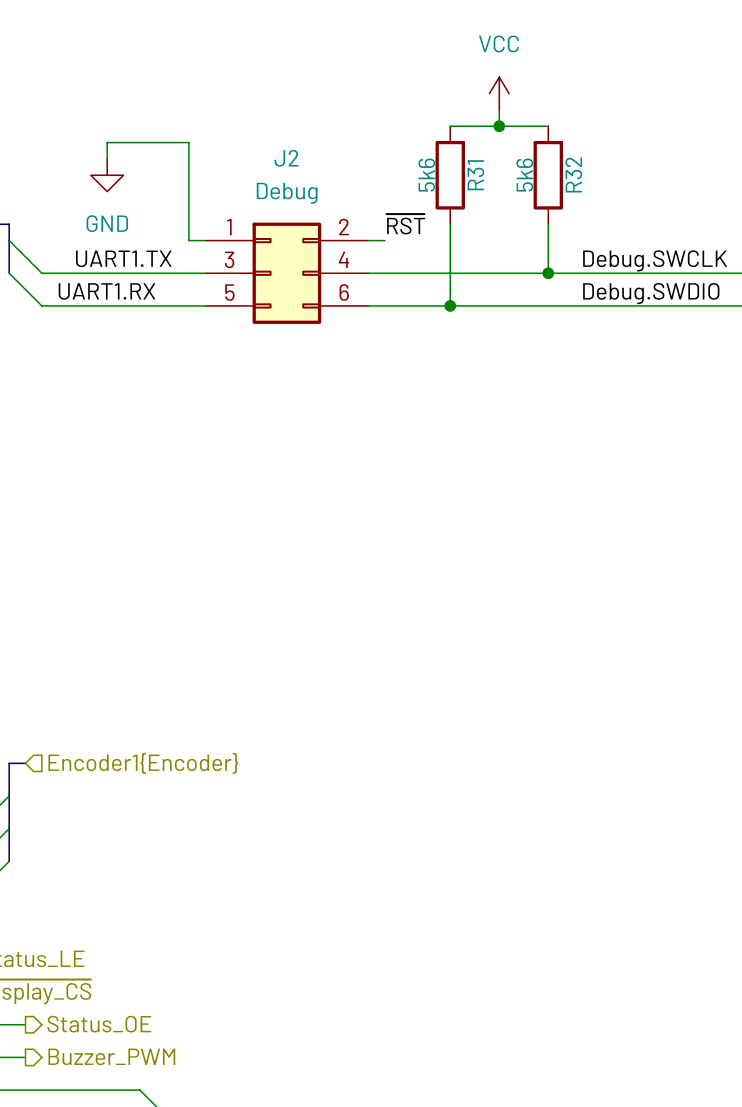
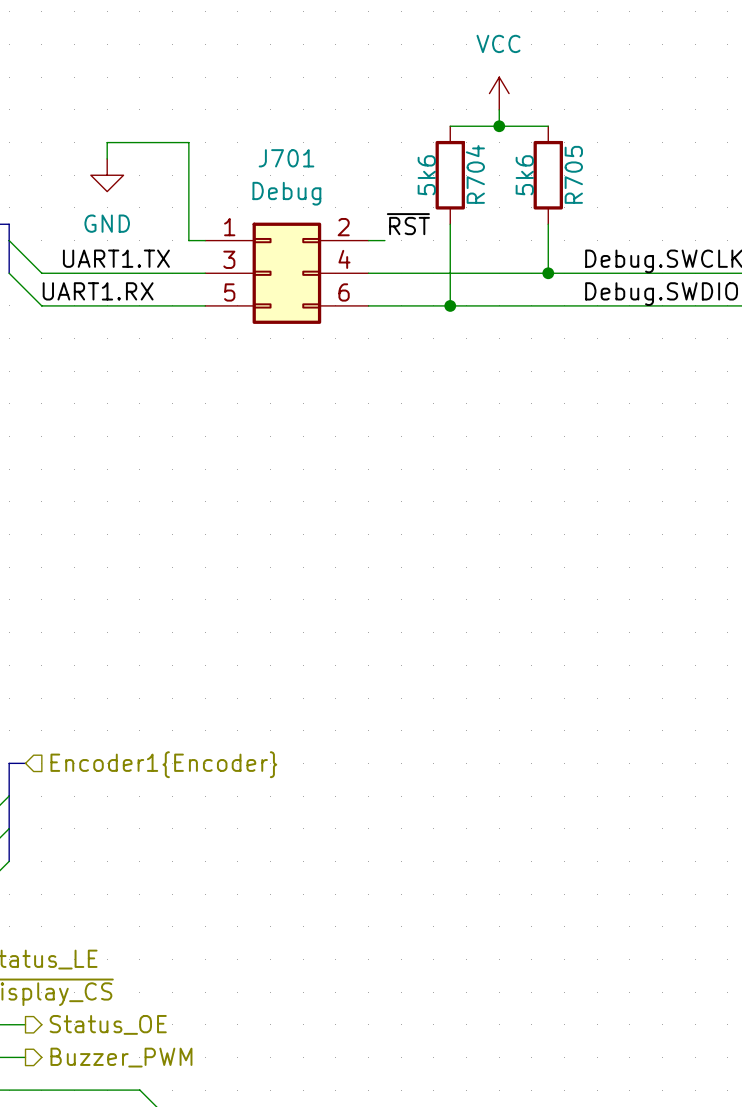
J2 name: J2 (286, 158) -> J701 (286, 158)
R32 name: R32 (573, 174) -> R705 (573, 174)
R31 name: R31 (475, 175) -> R704 (475, 174)

